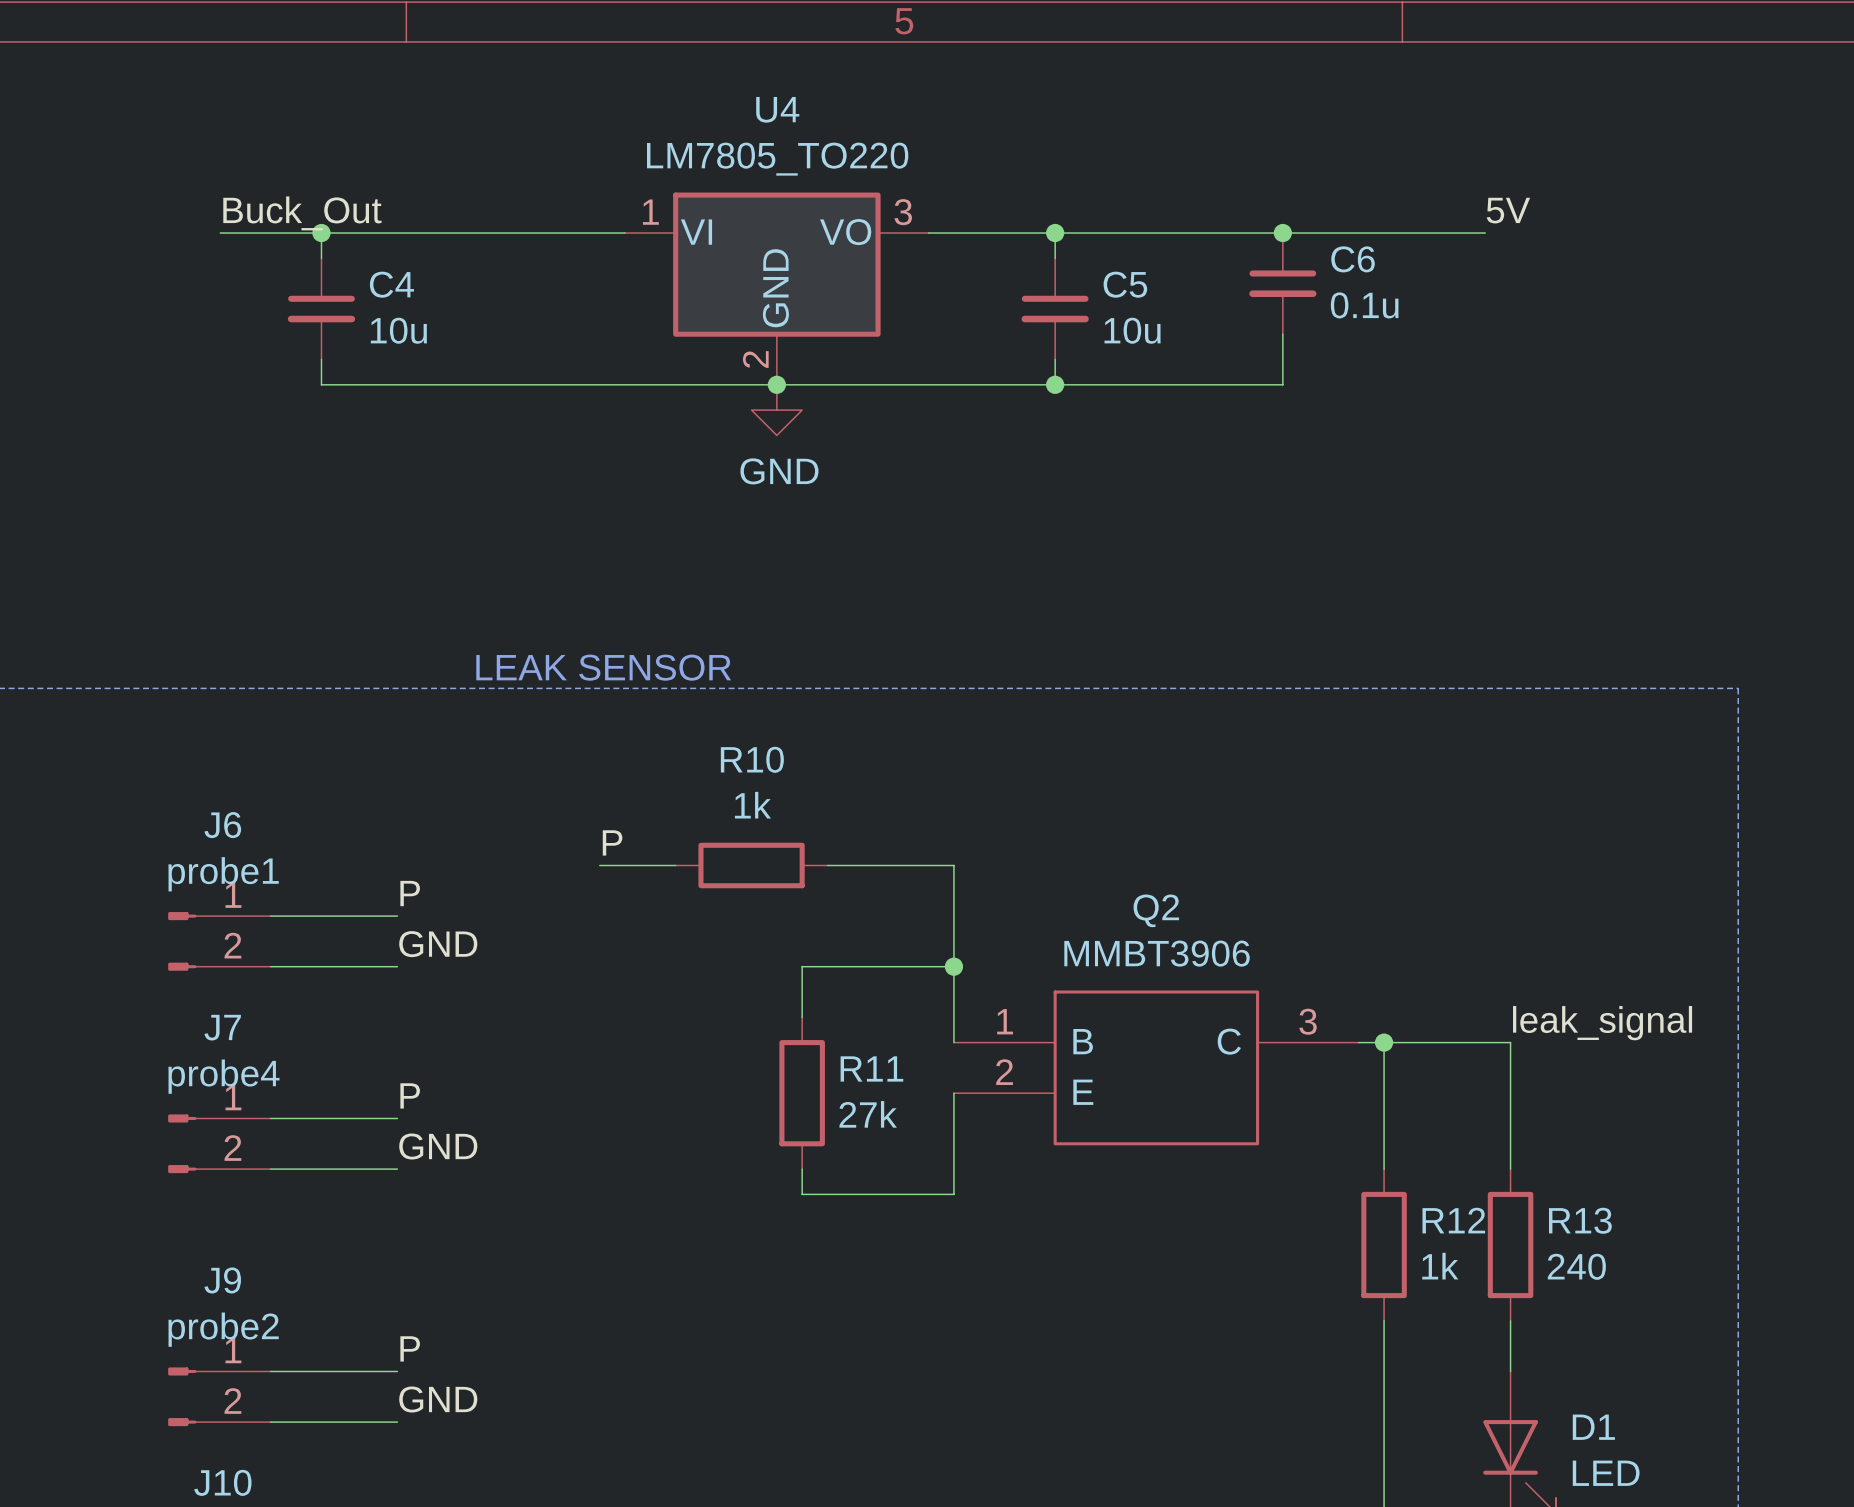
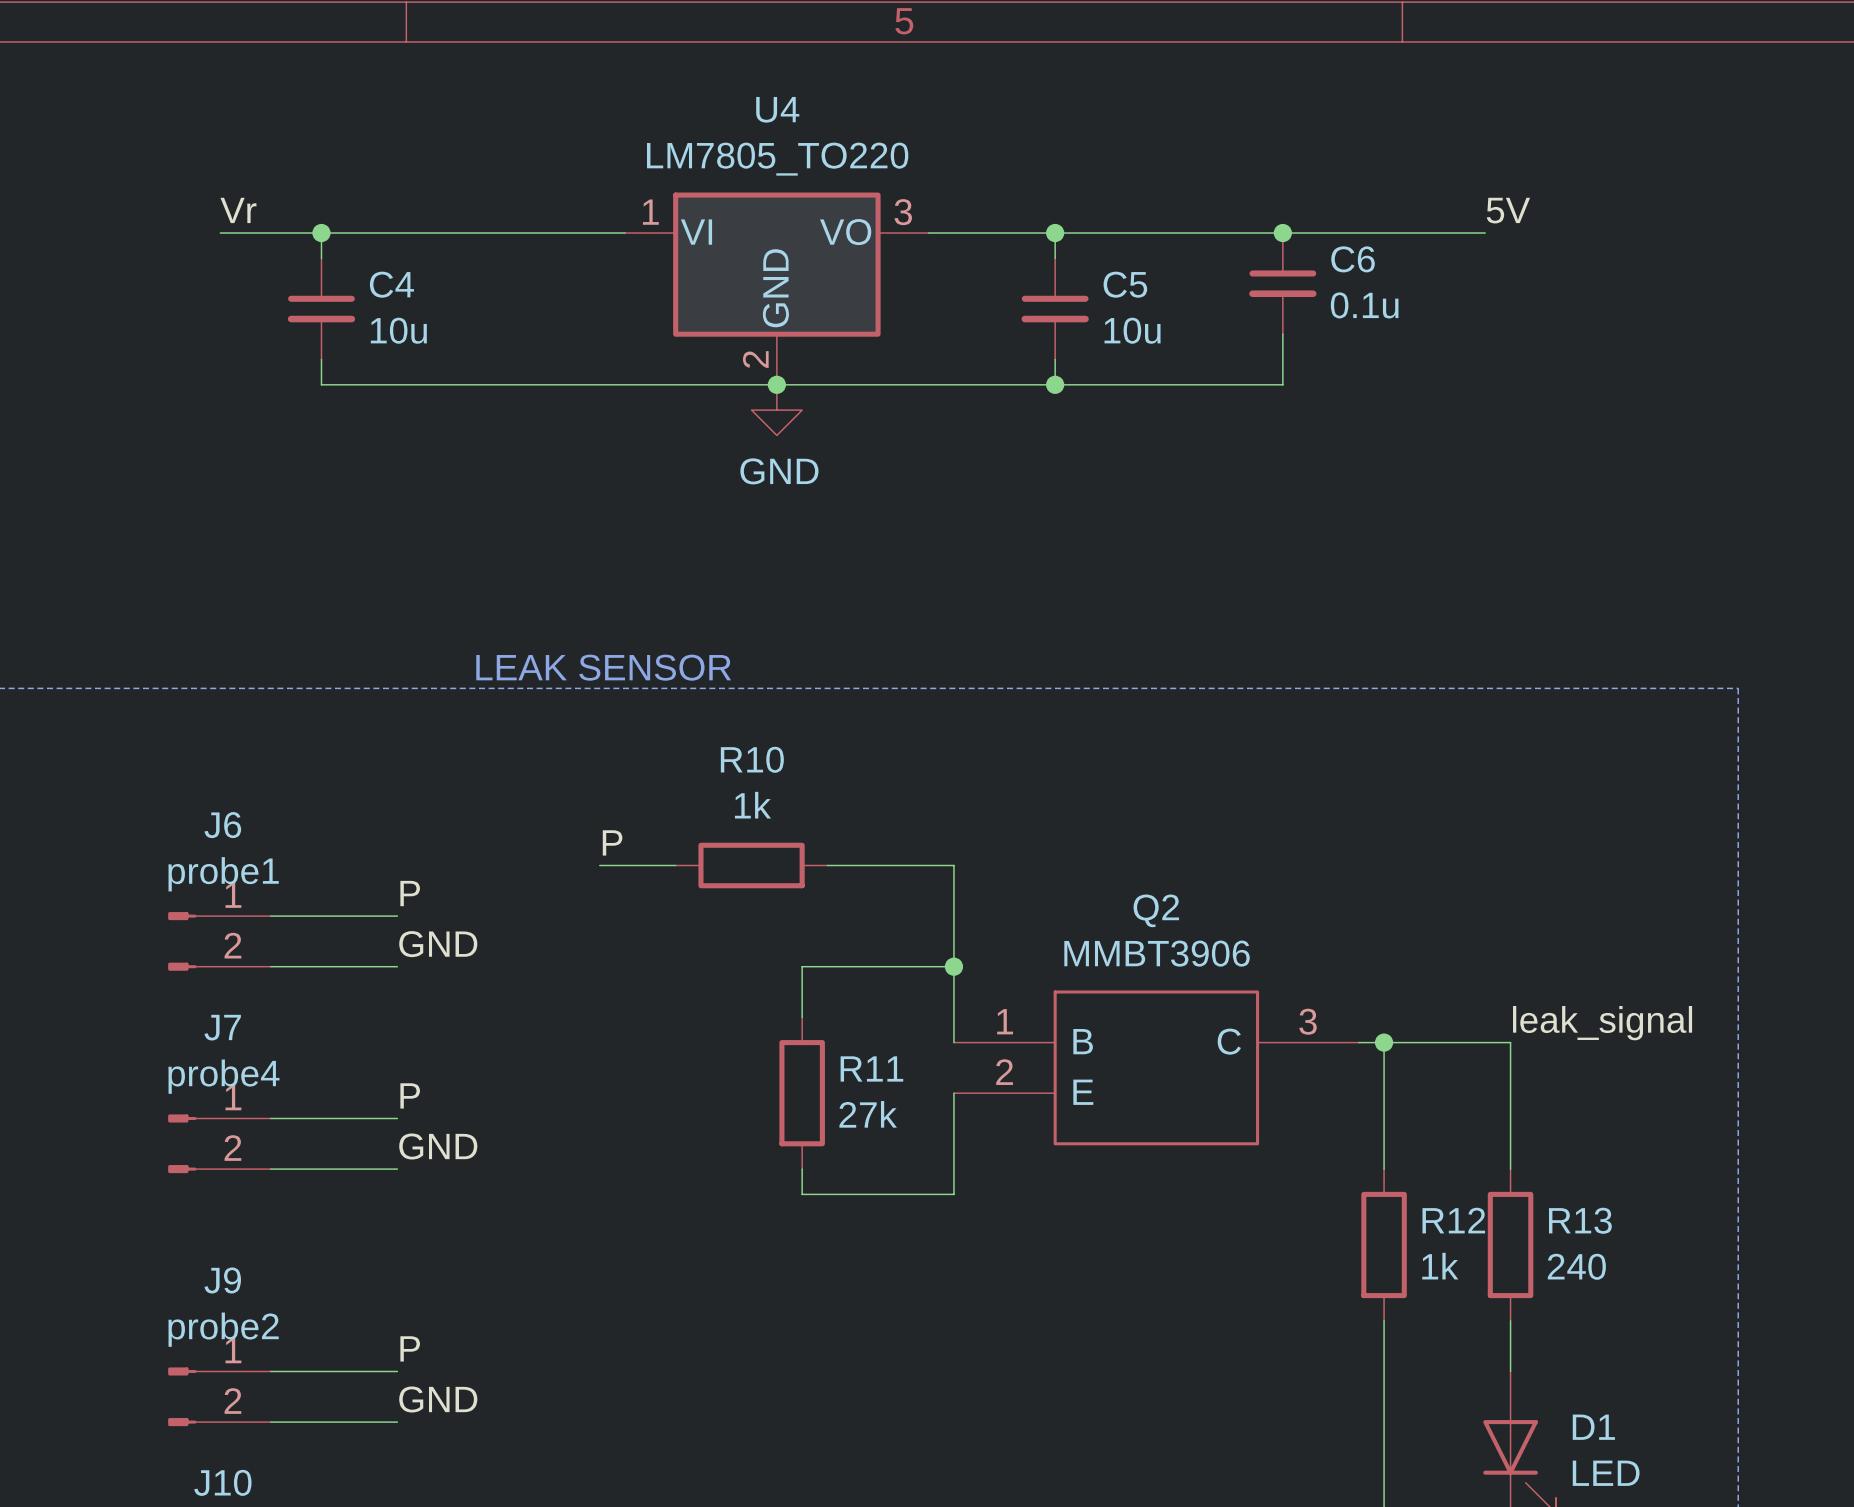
label: Buck_Out (302, 213) -> Vr (238, 210)

